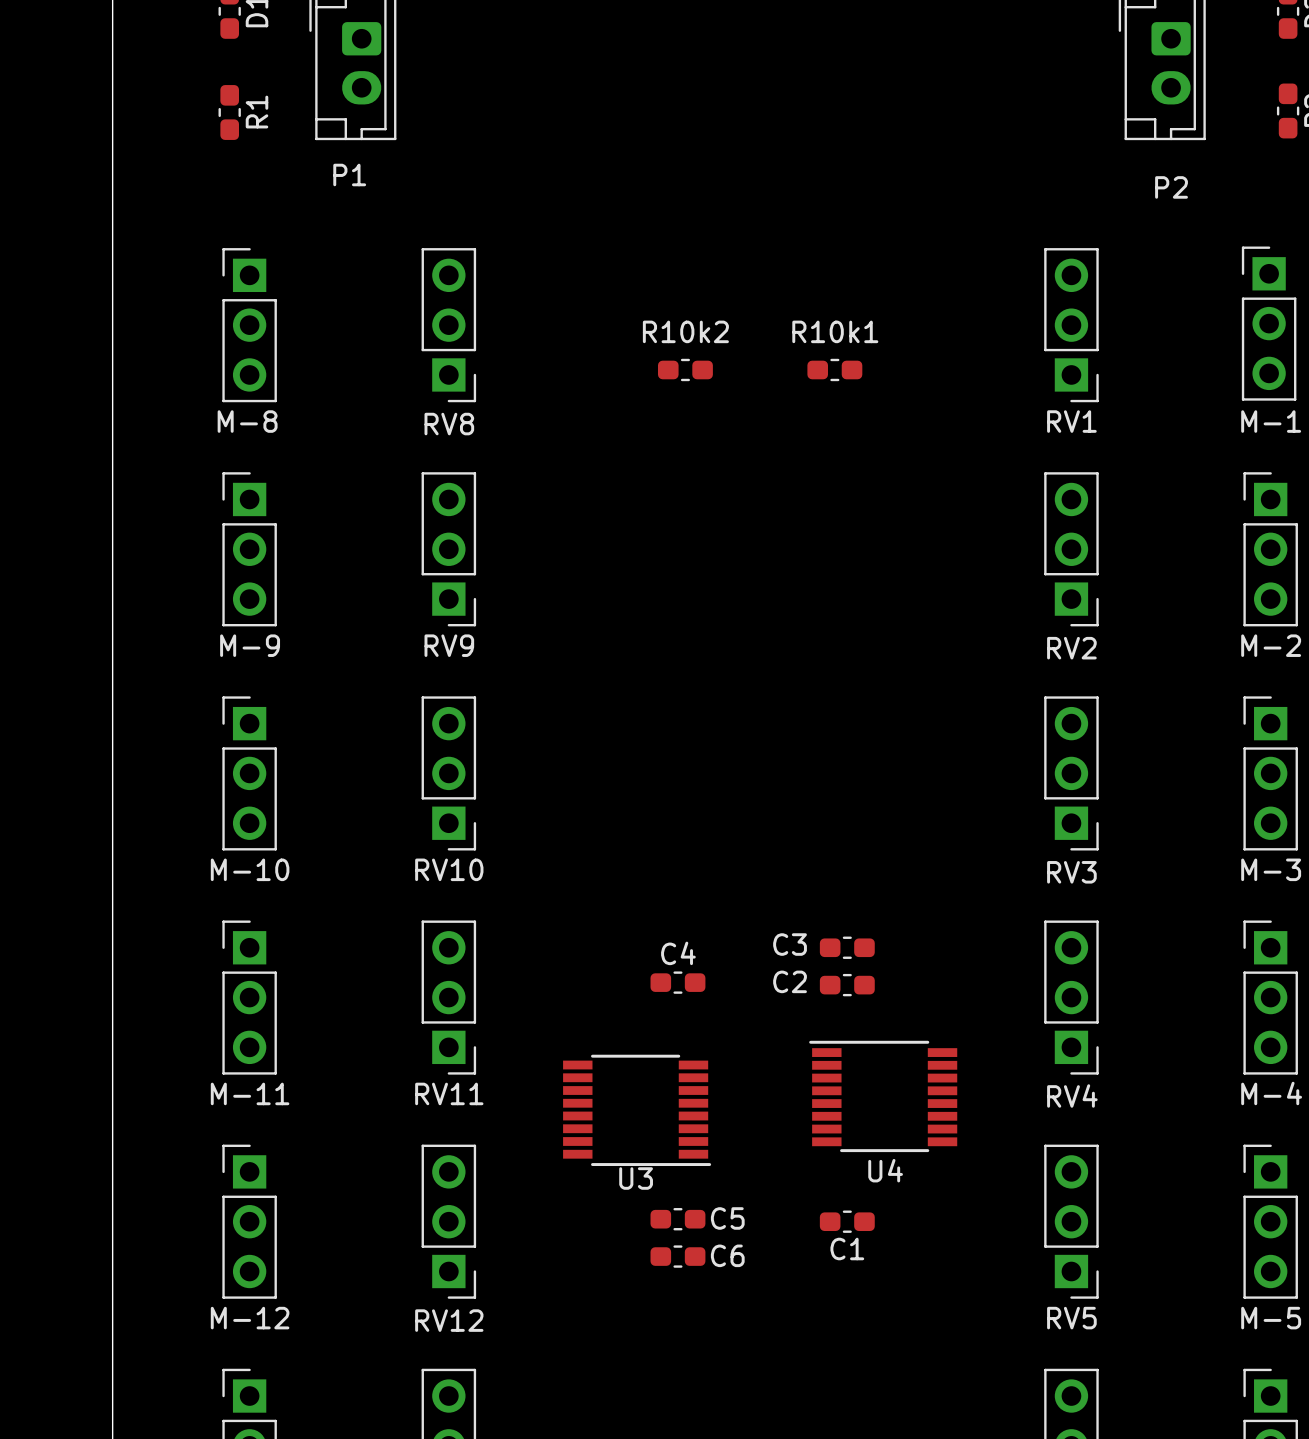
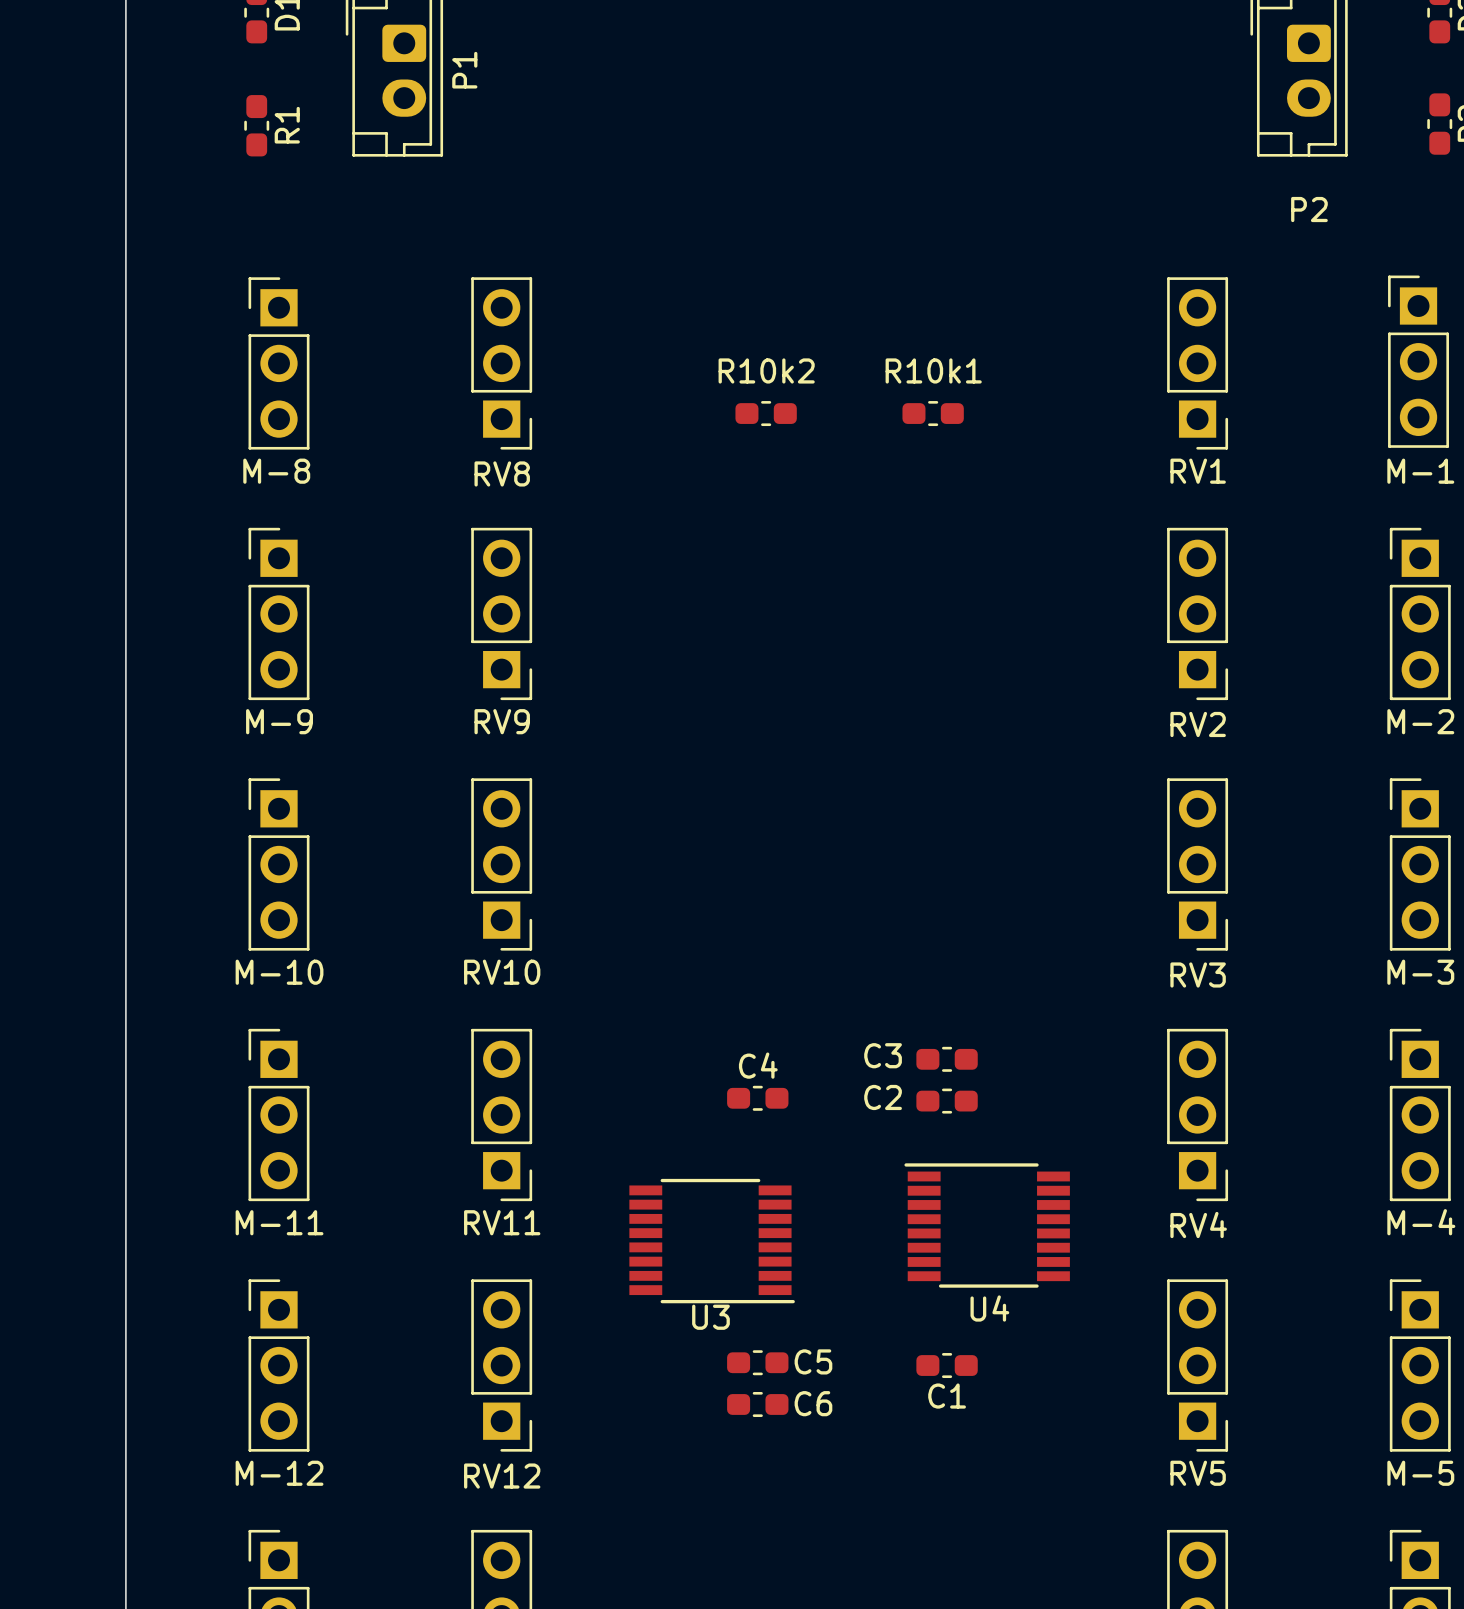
P1 name rotation: 0° (349, 175) -> 90° counterclockwise (464, 70)
P1 name position: P1 (349, 175) -> P1 (464, 70)

